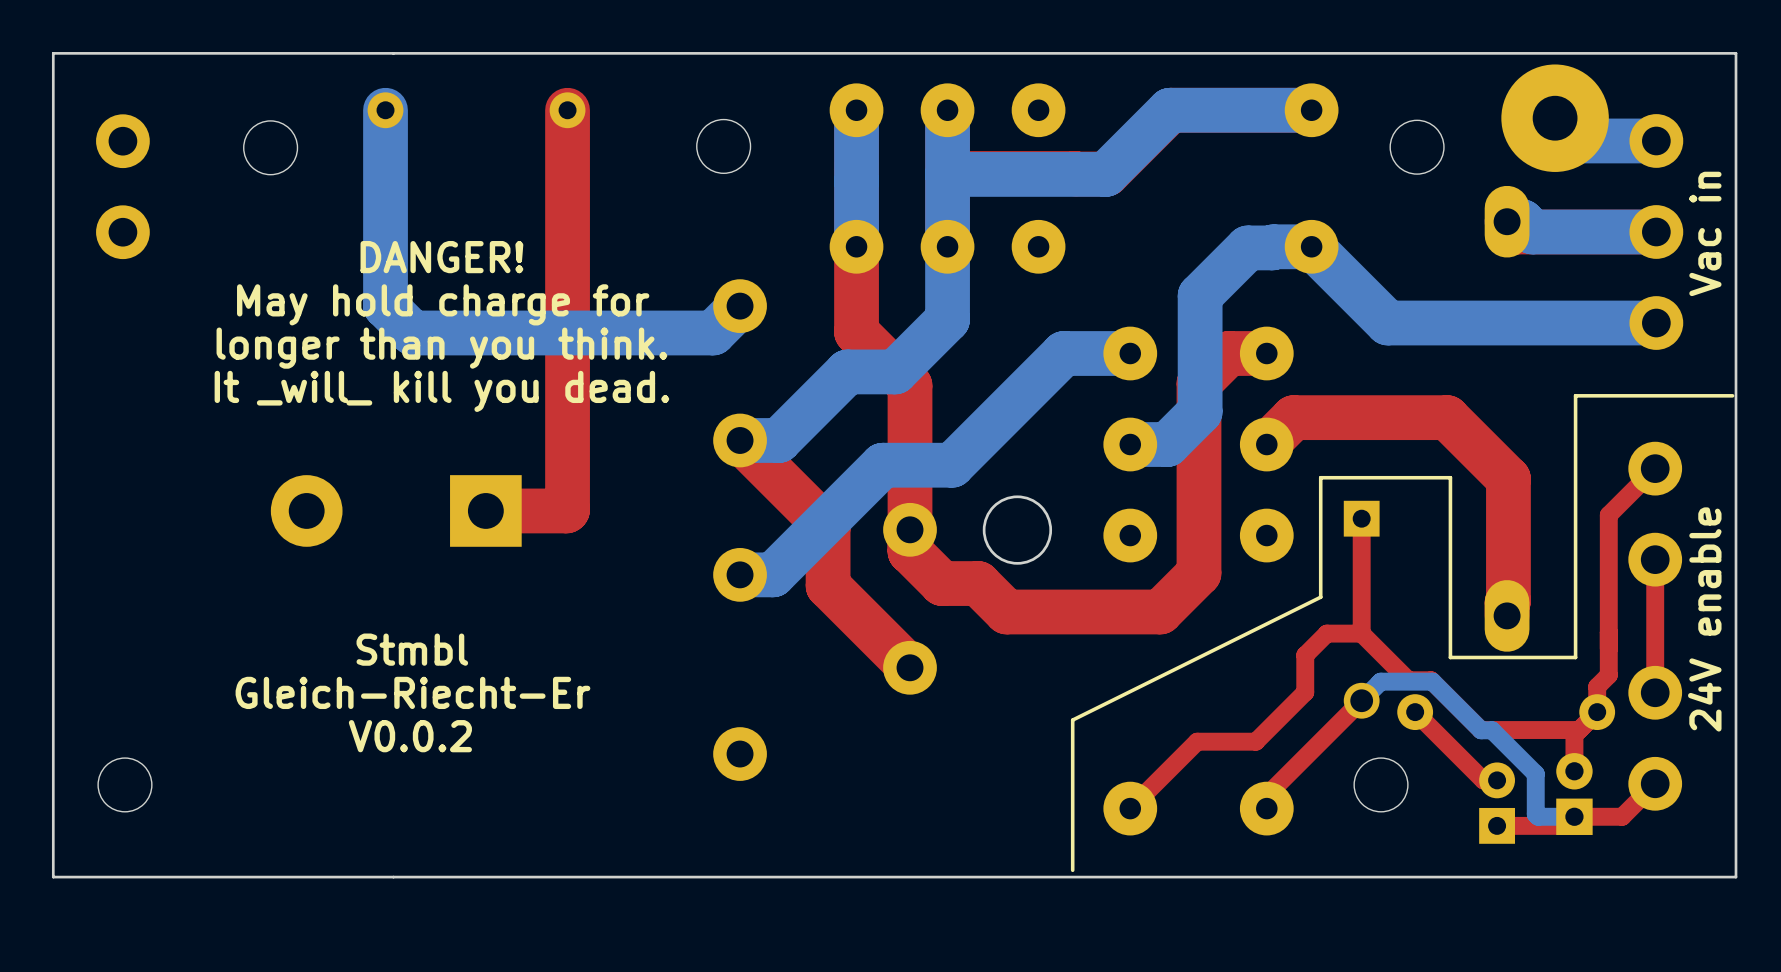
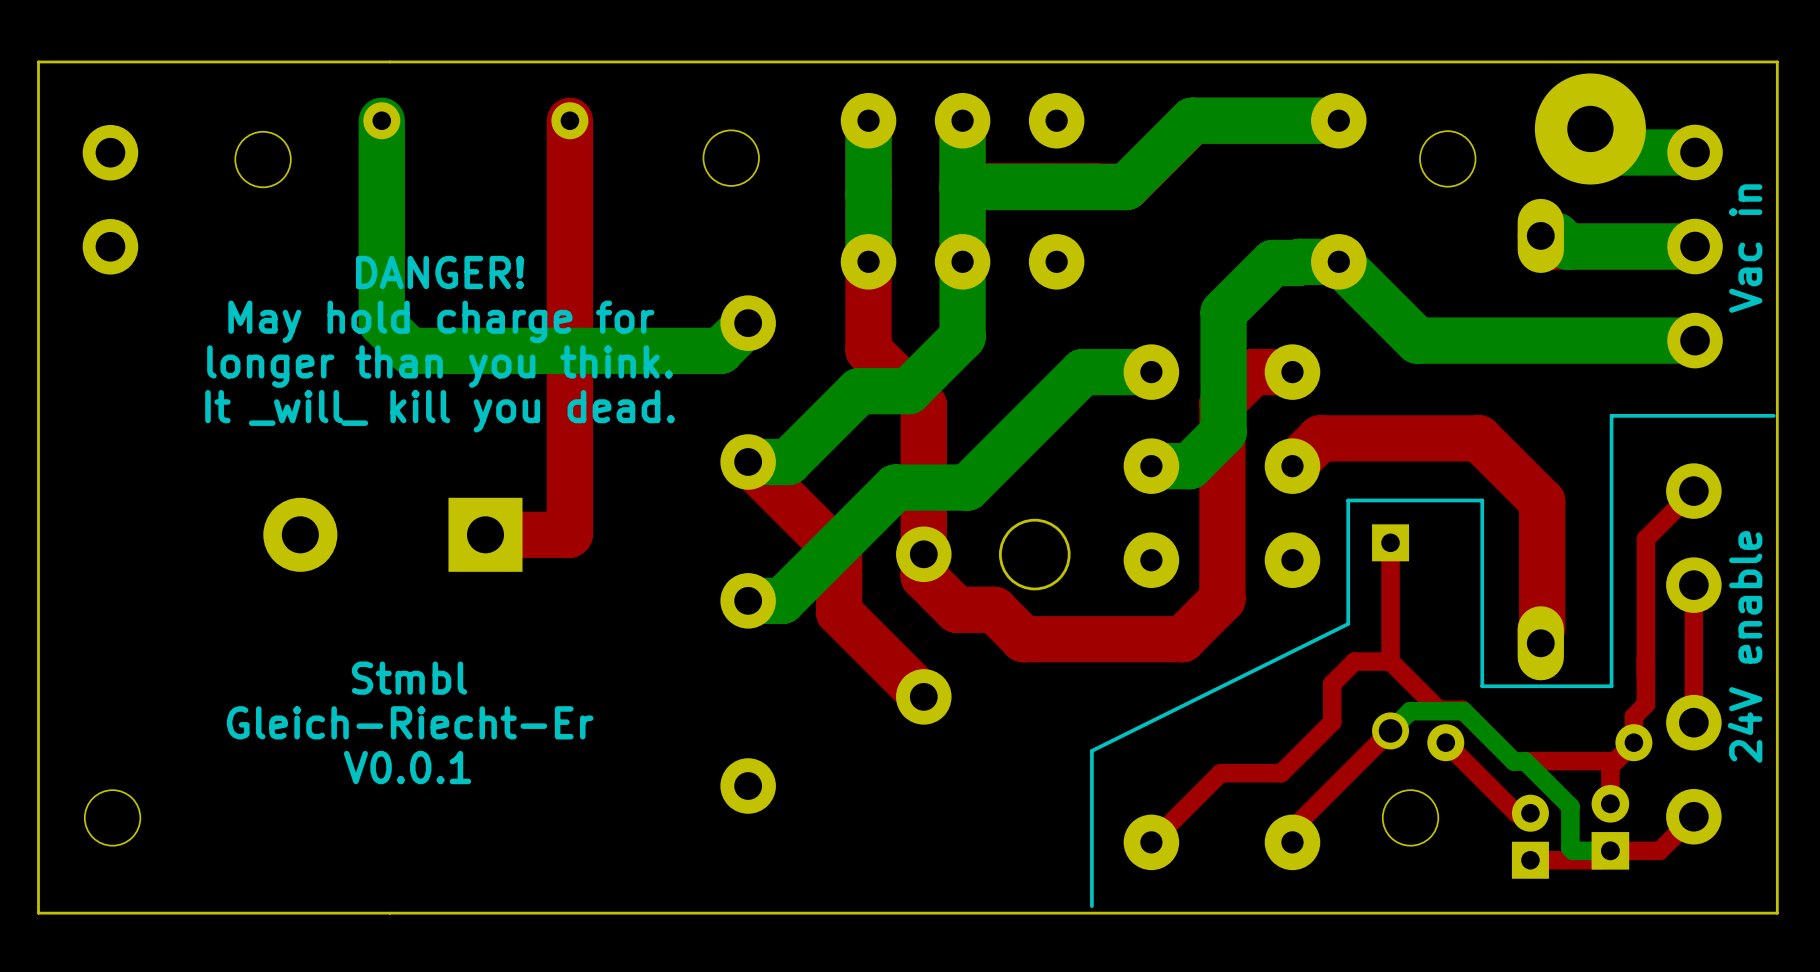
text: V0.0.2 (410, 736) -> V0.0.1 (407, 767)

